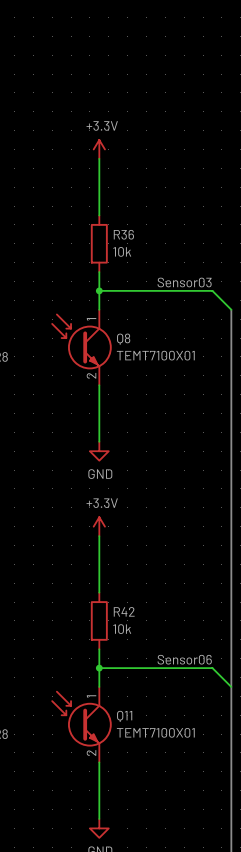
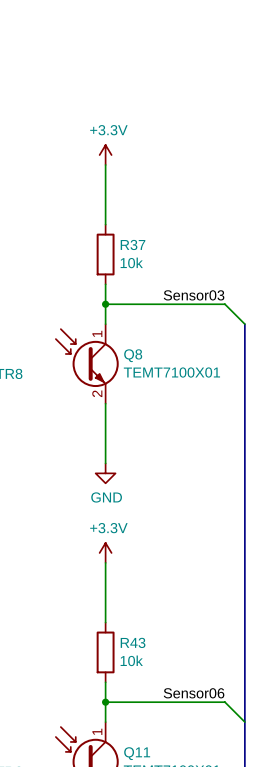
R36 name: R36 (123, 234) -> R37 (133, 244)
R42 name: R42 (124, 611) -> R43 (133, 642)

